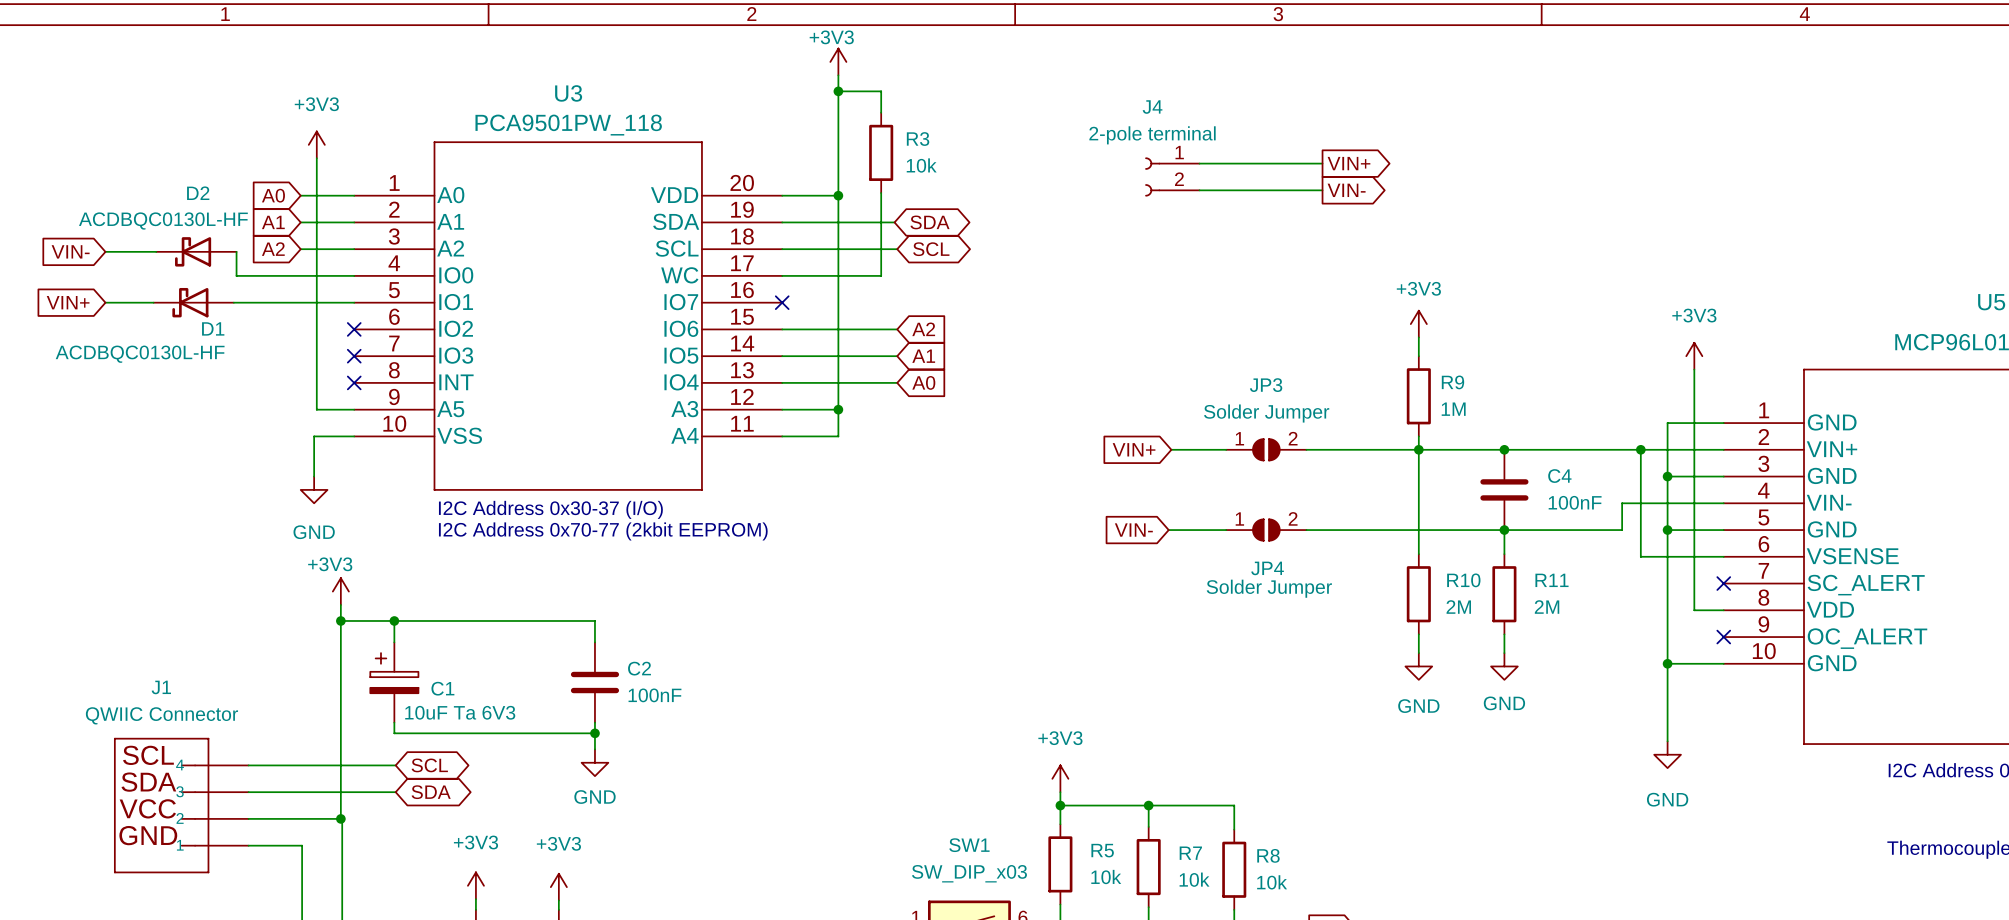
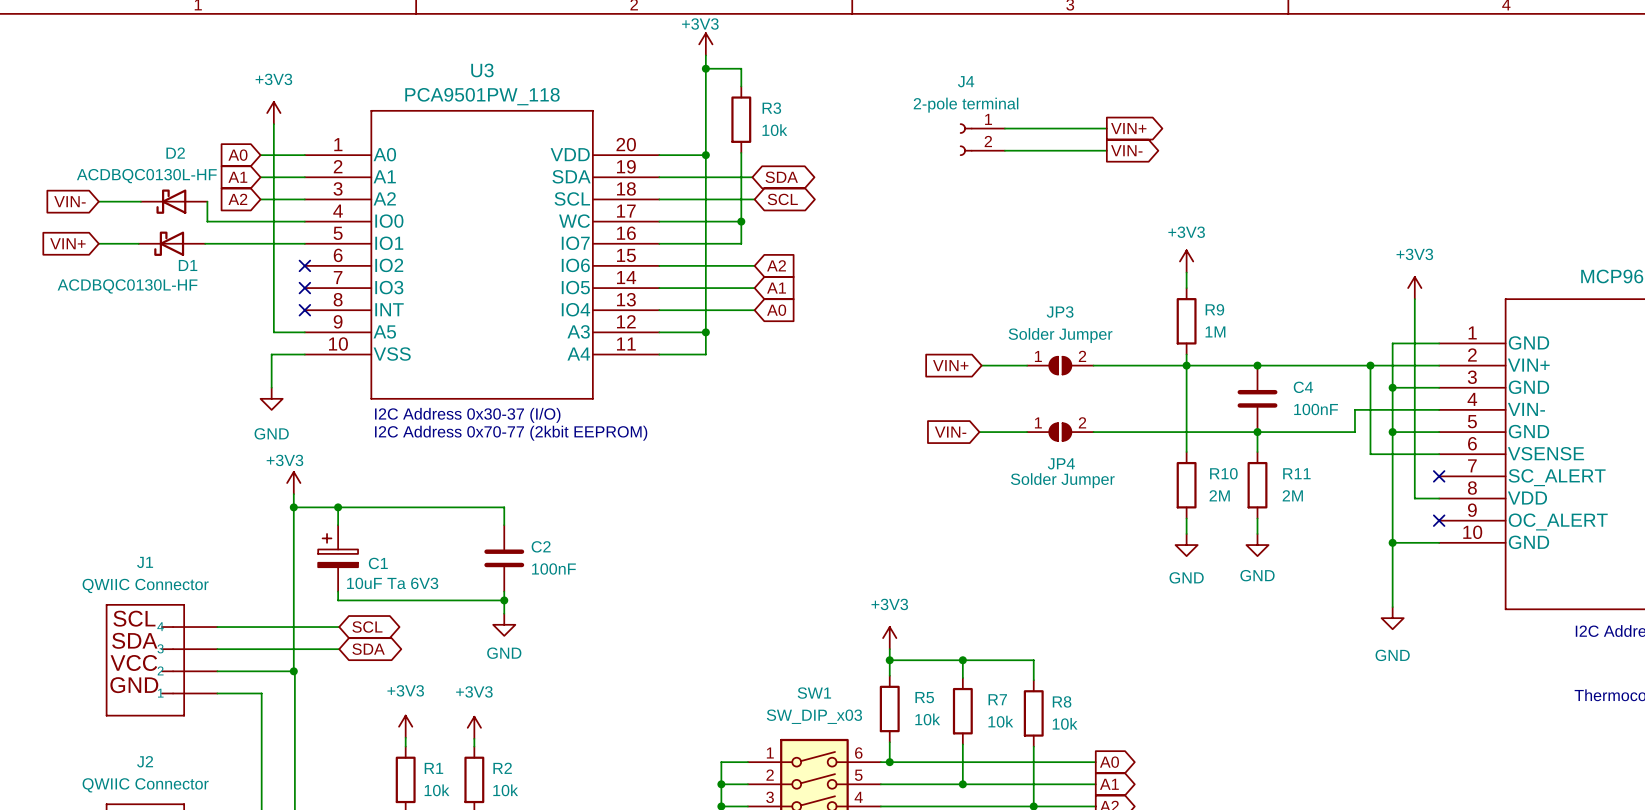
wire: none -> (741, 221) (741, 243) (659, 243)
junction: none -> (741, 221)
no-connect mark: (782, 302) -> none

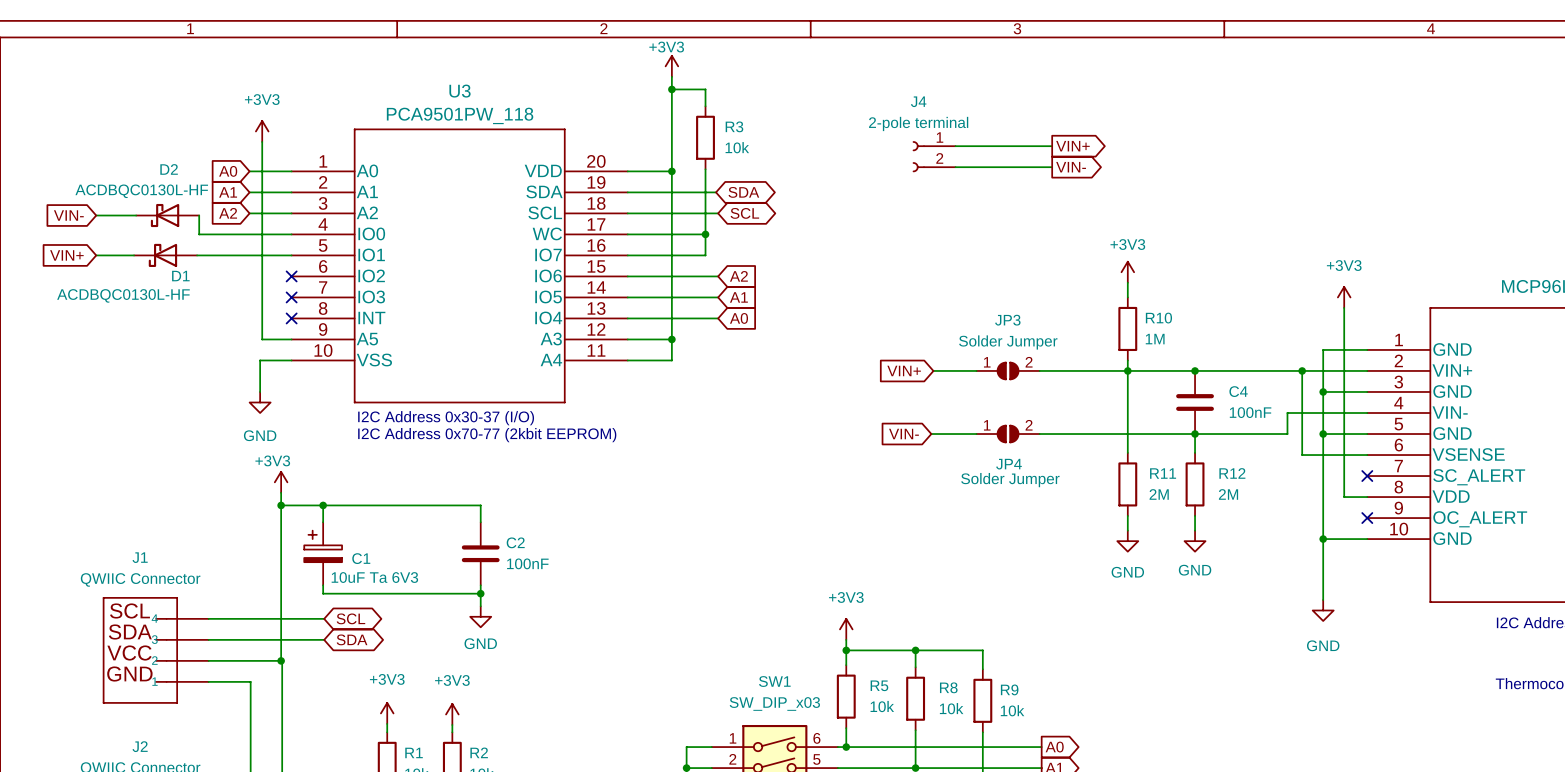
R9 name: R9 (1214, 309) -> R10 (1158, 318)
R10 name: R10 (1223, 473) -> R11 (1163, 473)
R11 name: R11 (1296, 473) -> R12 (1232, 473)
R7 name: R7 (997, 699) -> R8 (948, 687)
R8 name: R8 (1062, 701) -> R9 (1009, 689)

